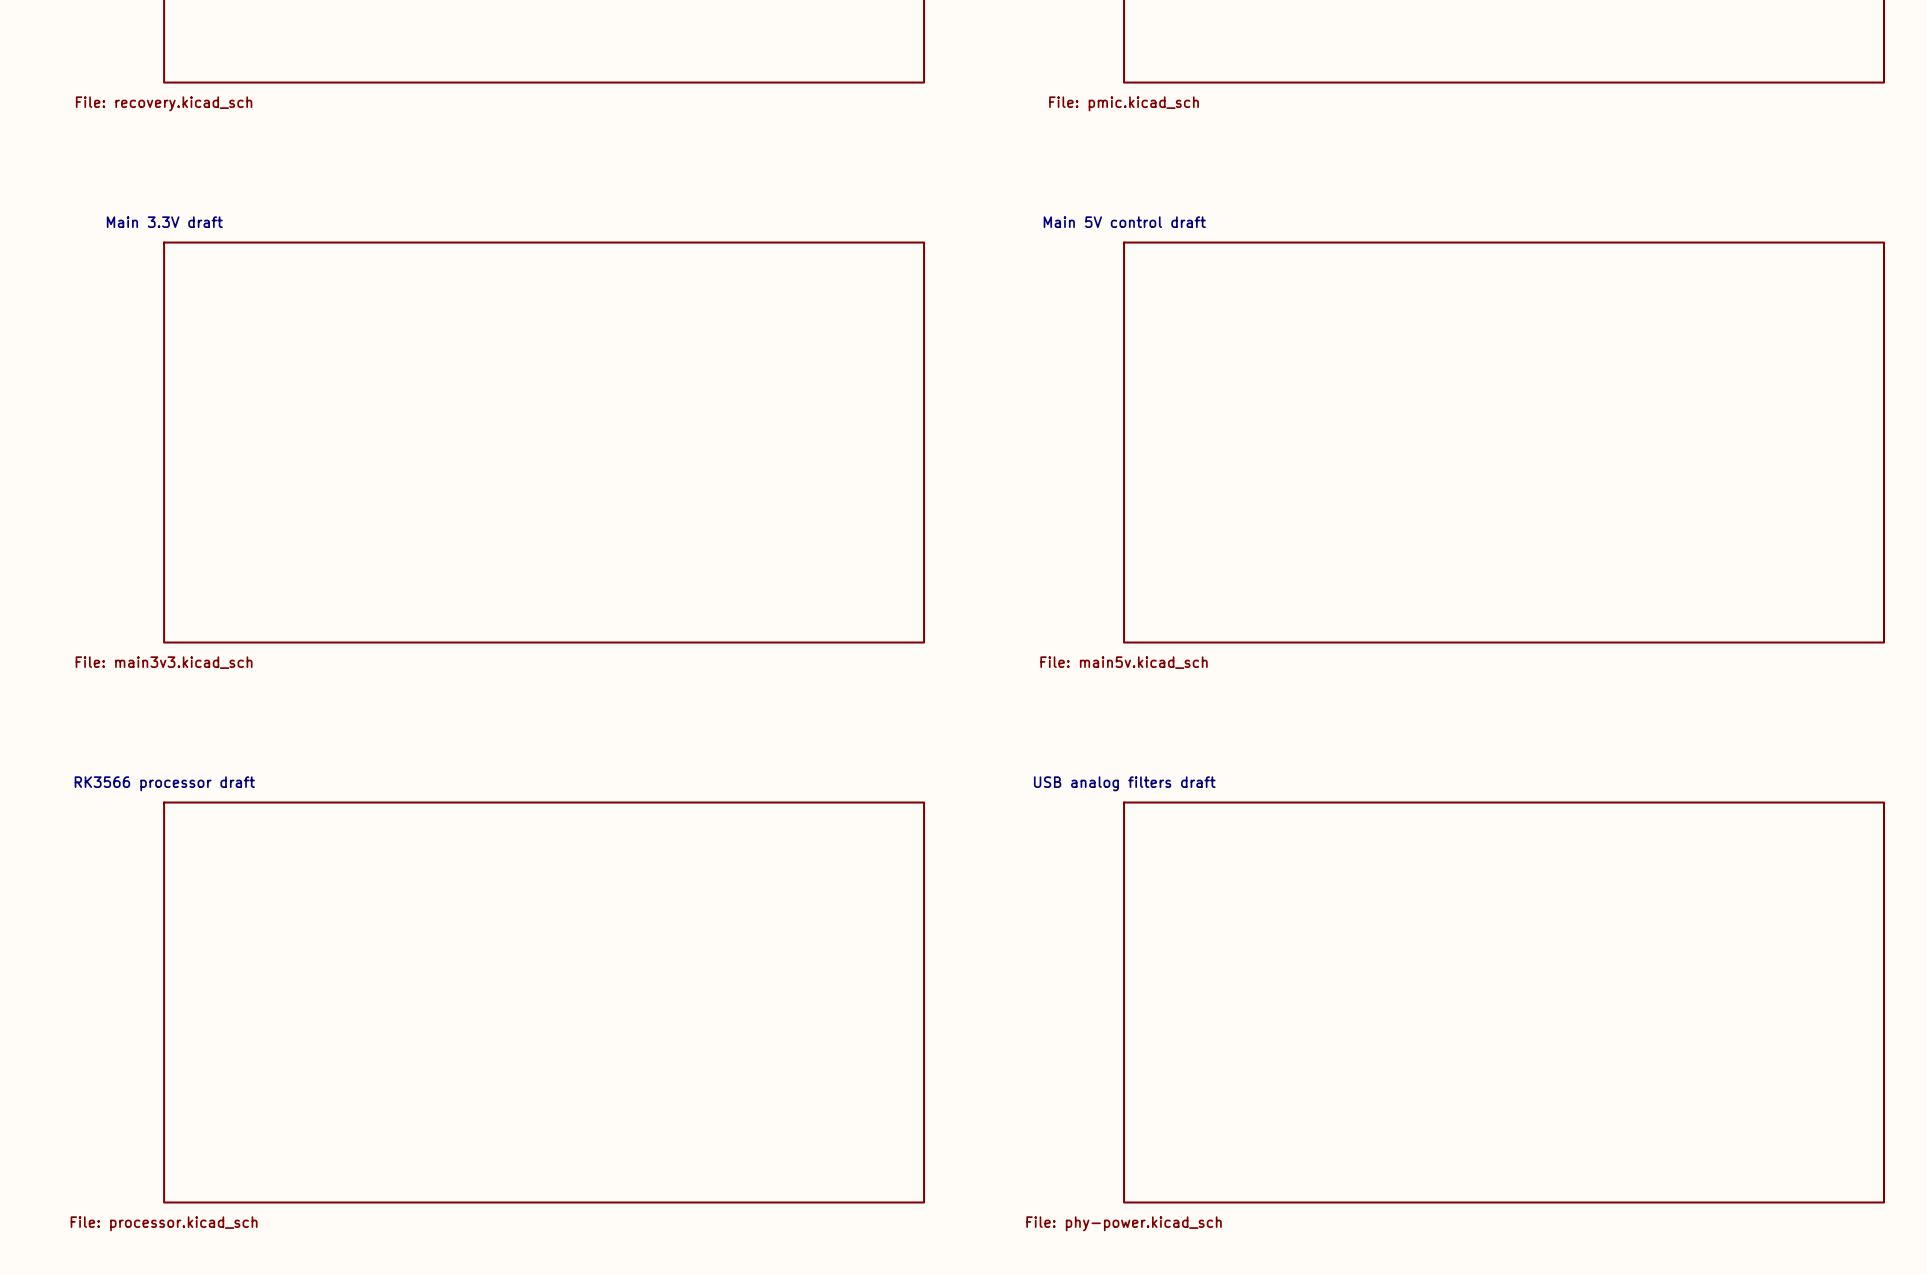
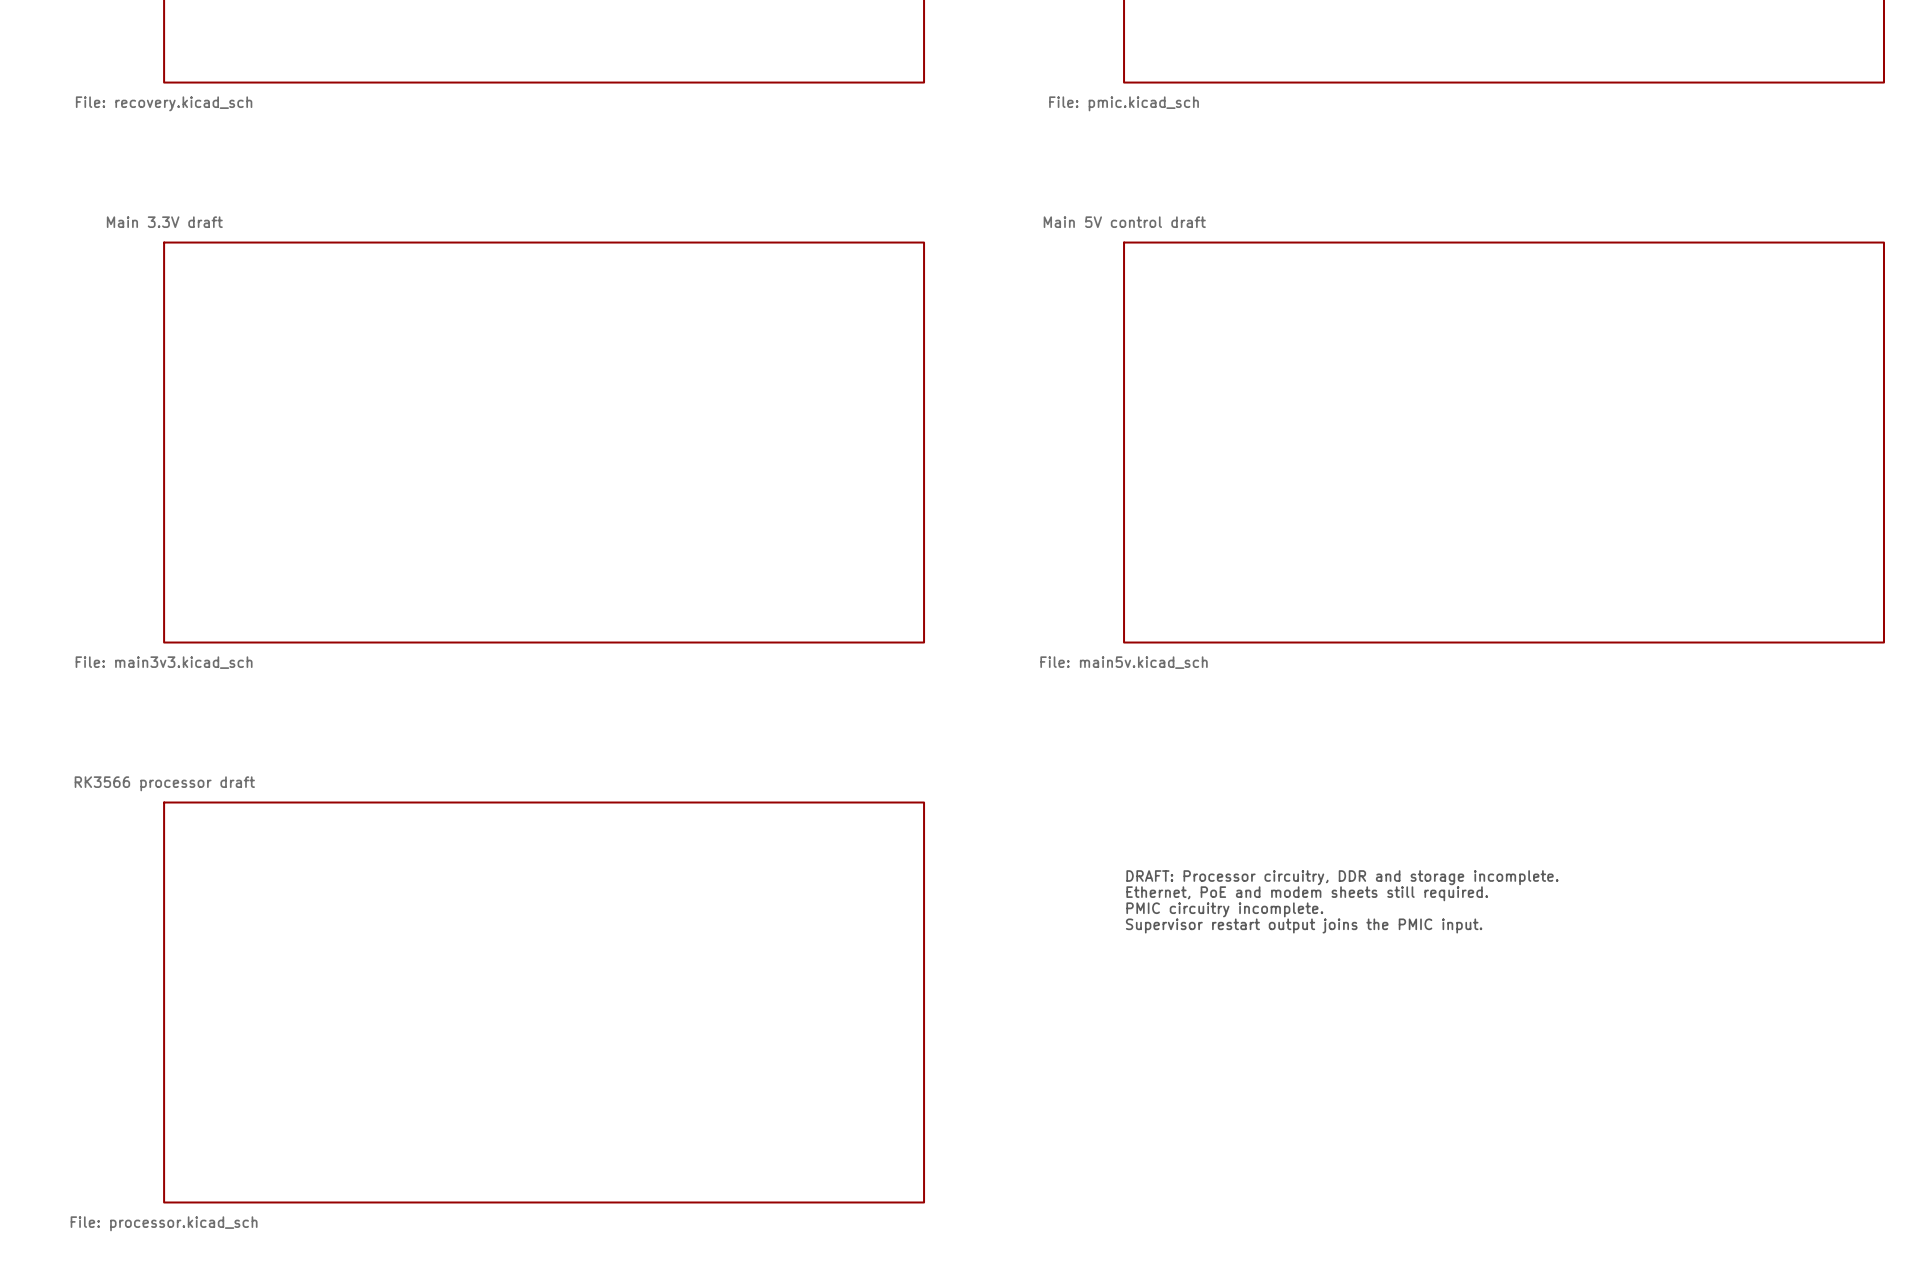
text: none -> DRAFT: Processor circuitry, DDR and storage incomplete. (1342, 877)
text: none -> Ethernet, PoE and modem sheets still required. (1307, 893)
text: none -> PMIC circuitry incomplete. (1224, 909)
text: none -> Supervisor restart output joins the PMIC input. (1304, 925)
sheet USB analog filters draft: File: phy-power.kicad_sch (1504, 1002) -> none

